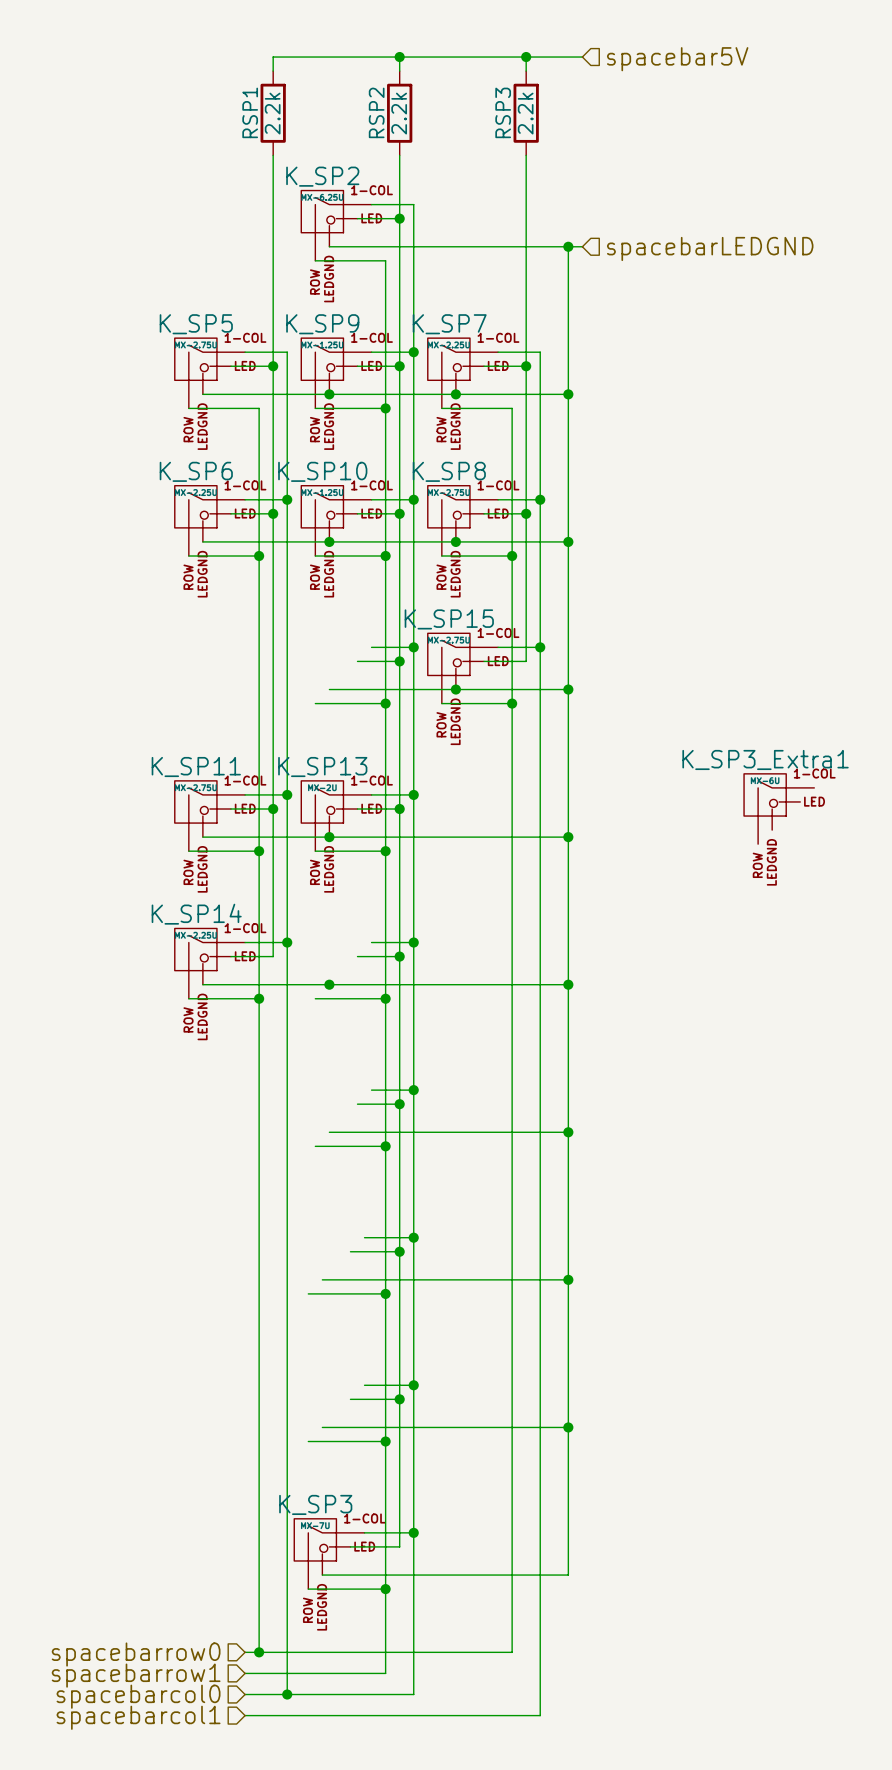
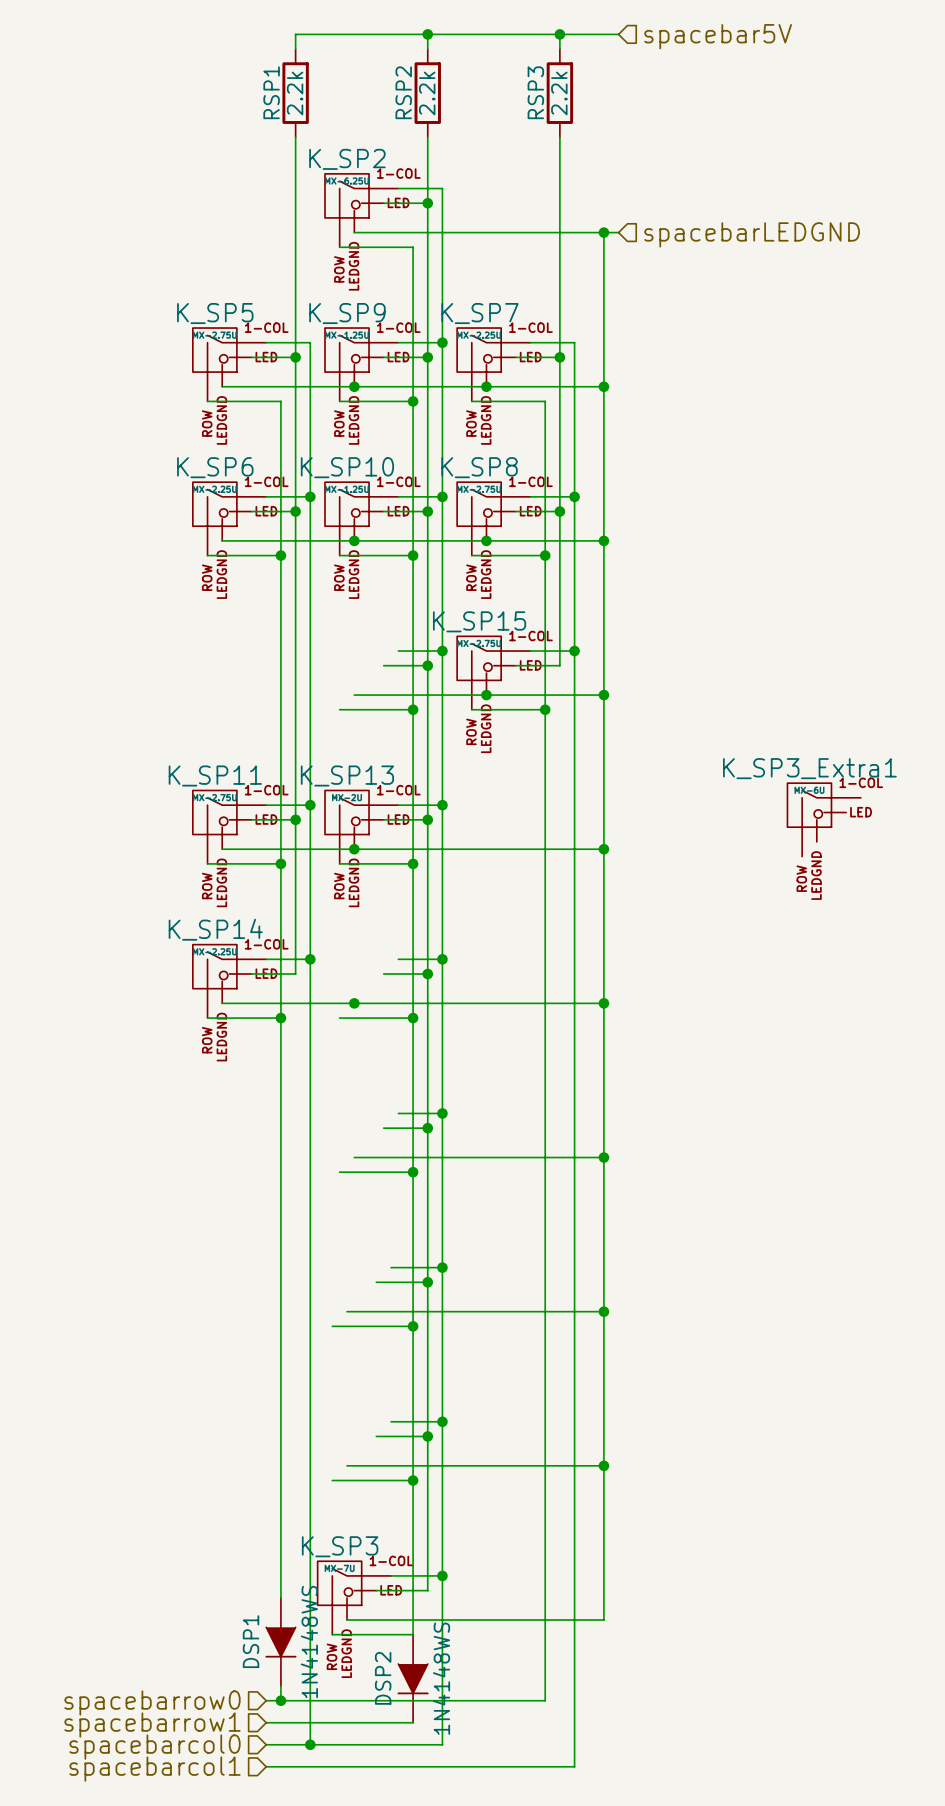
junction: (385, 1589) -> none
DSP1: none -> 1N4148WS (280, 1642)
DSP2: none -> 1N4148WS (413, 1678)

